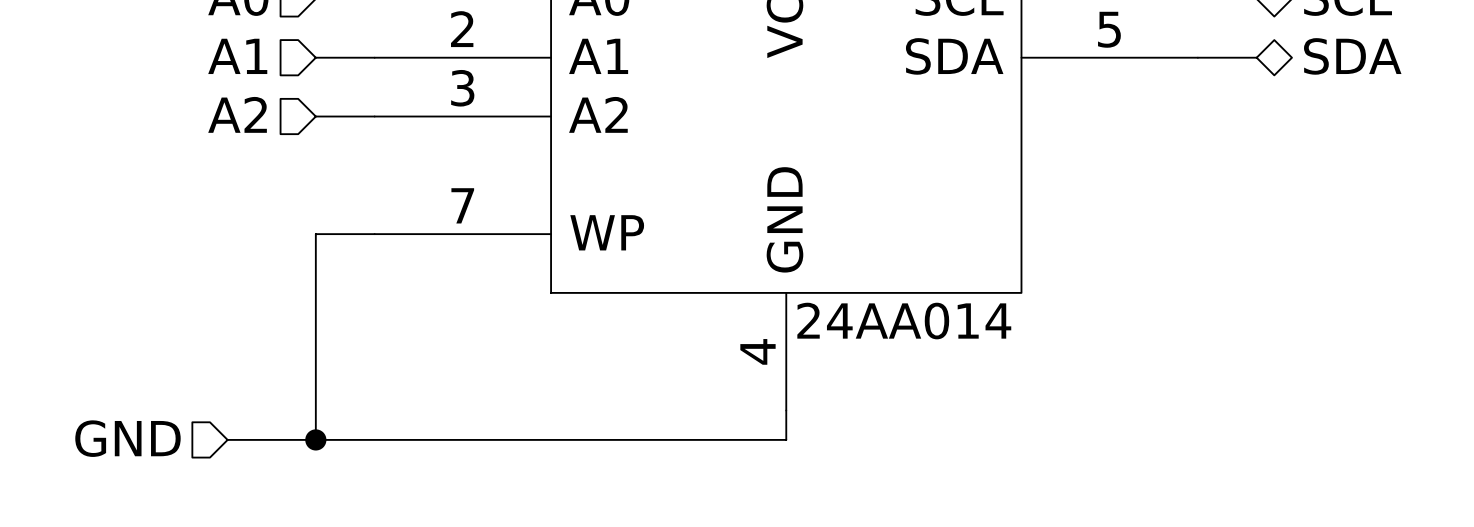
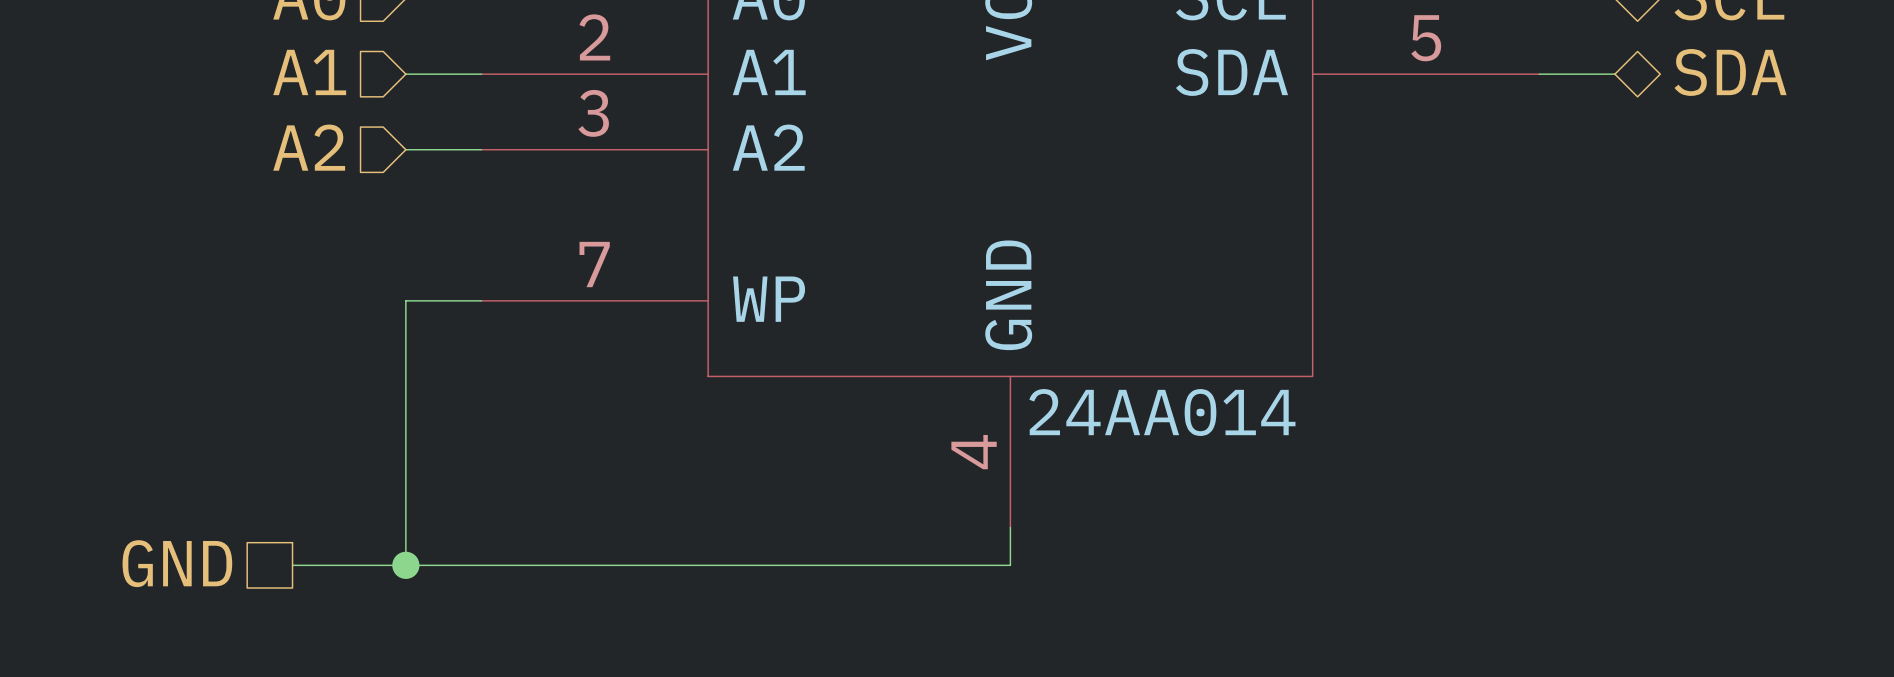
hierarchical label shape: input (127, 438) -> passive (177, 563)

